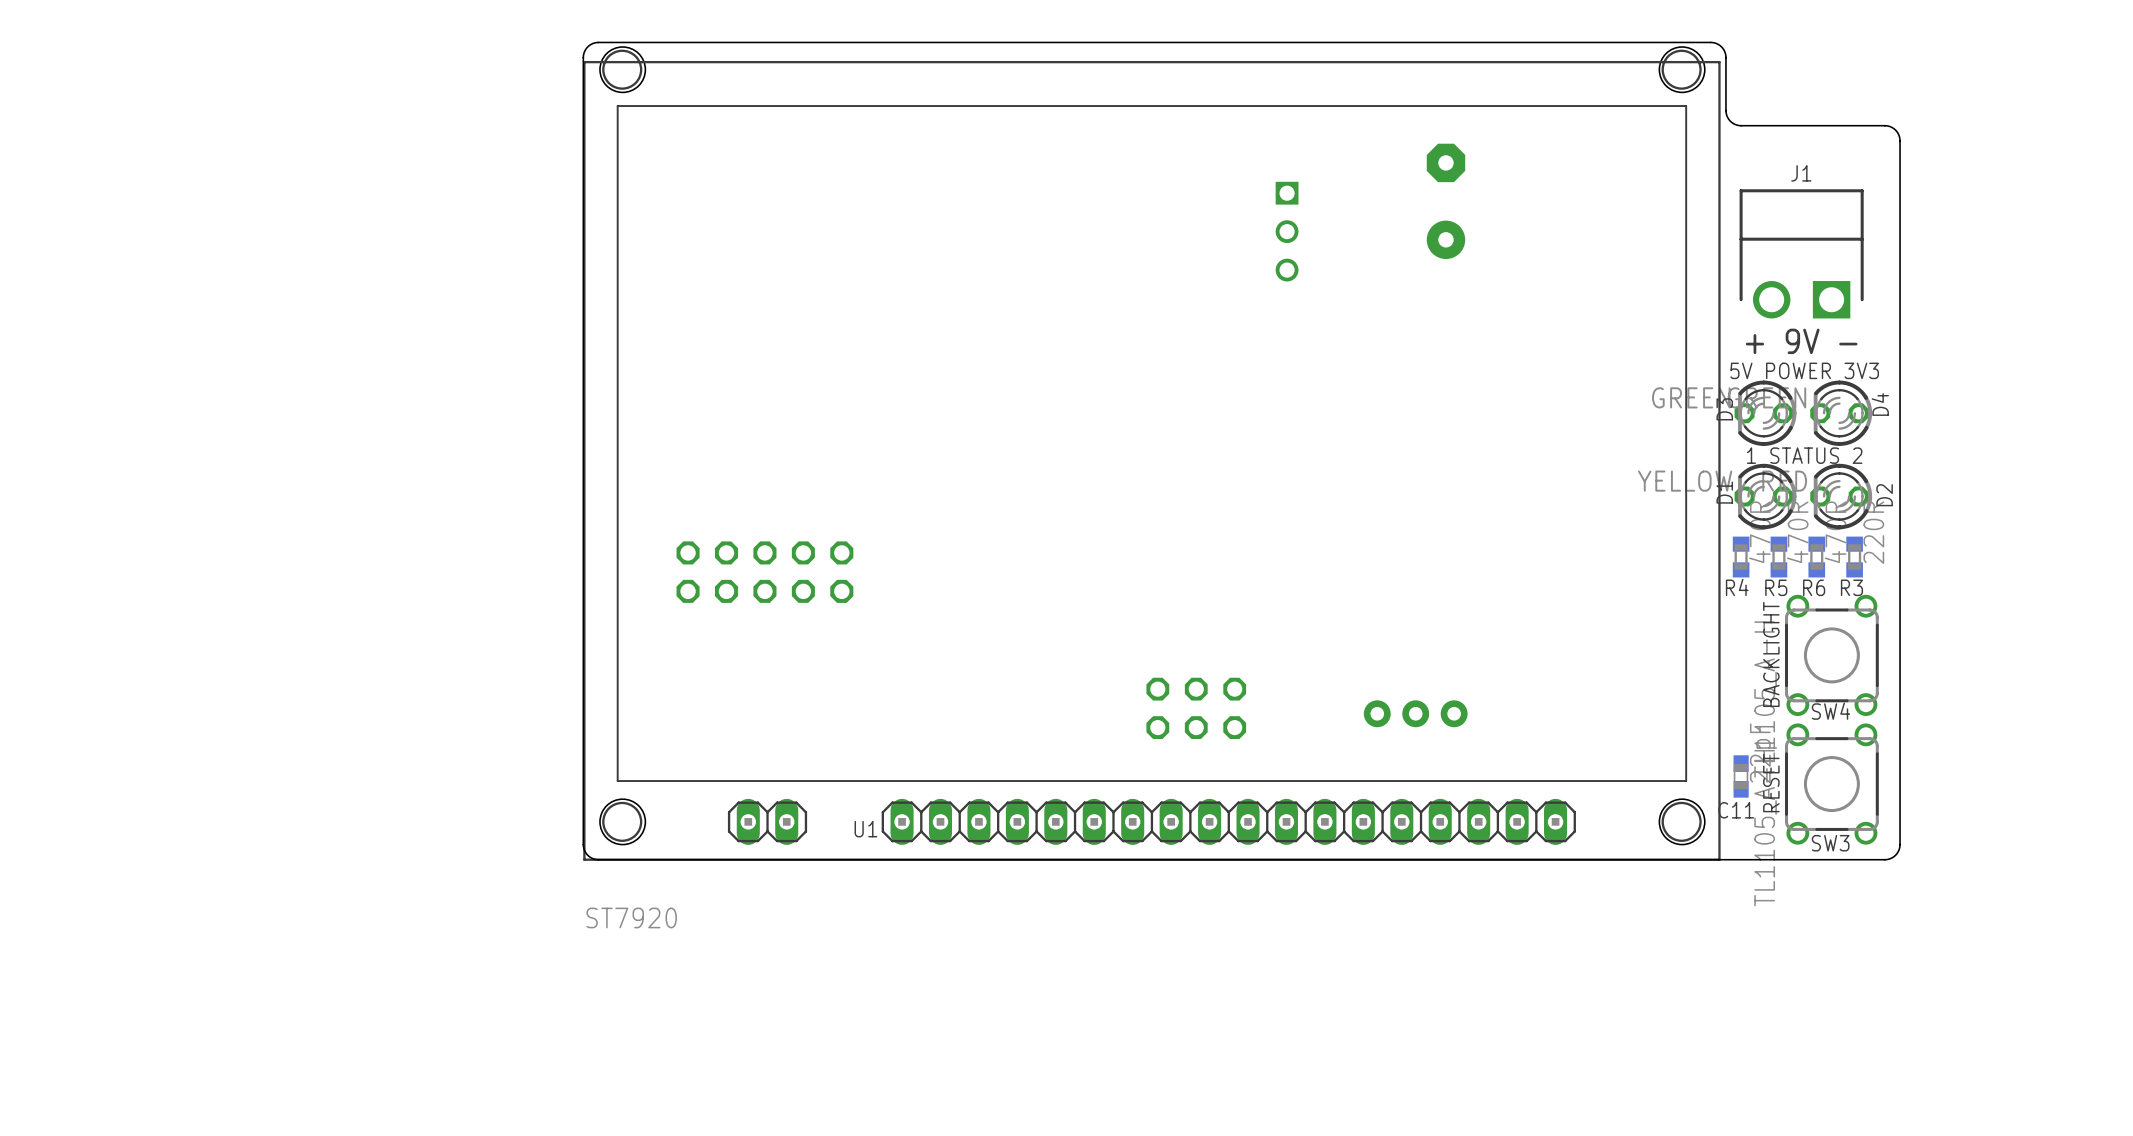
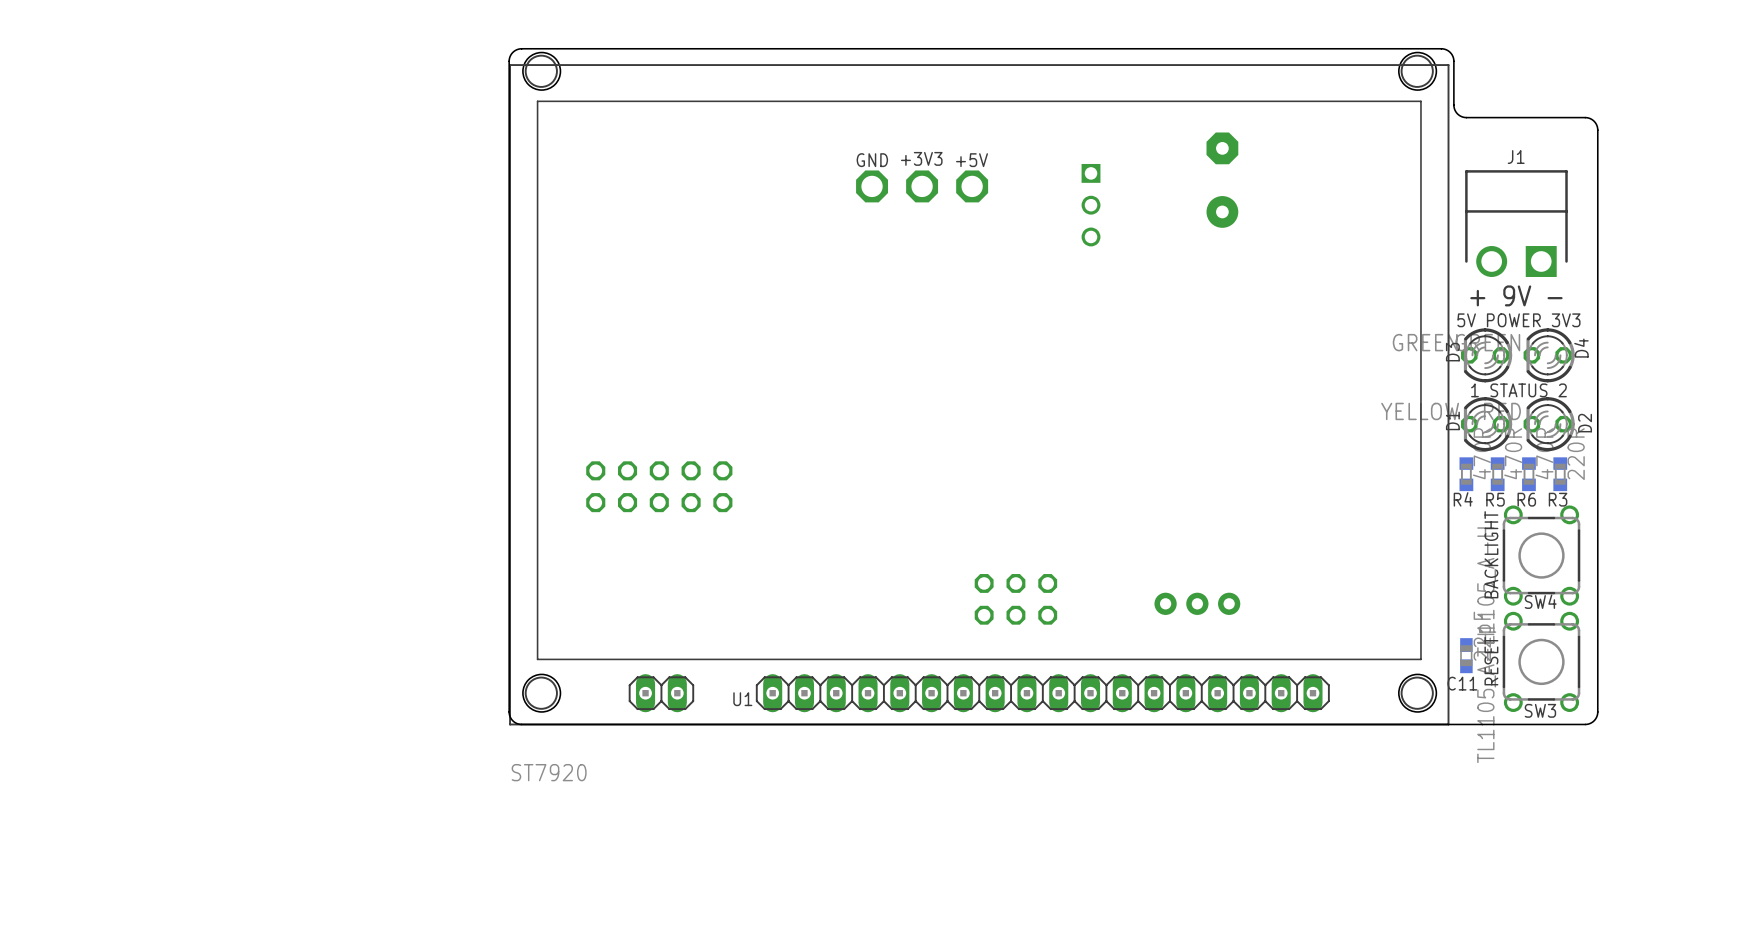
text: none -> +3V3 (921, 158)
text: none -> GND (872, 160)
text: none -> +5V (971, 160)
part: none -> (872, 186)
part: none -> (922, 186)
part: none -> (972, 186)

